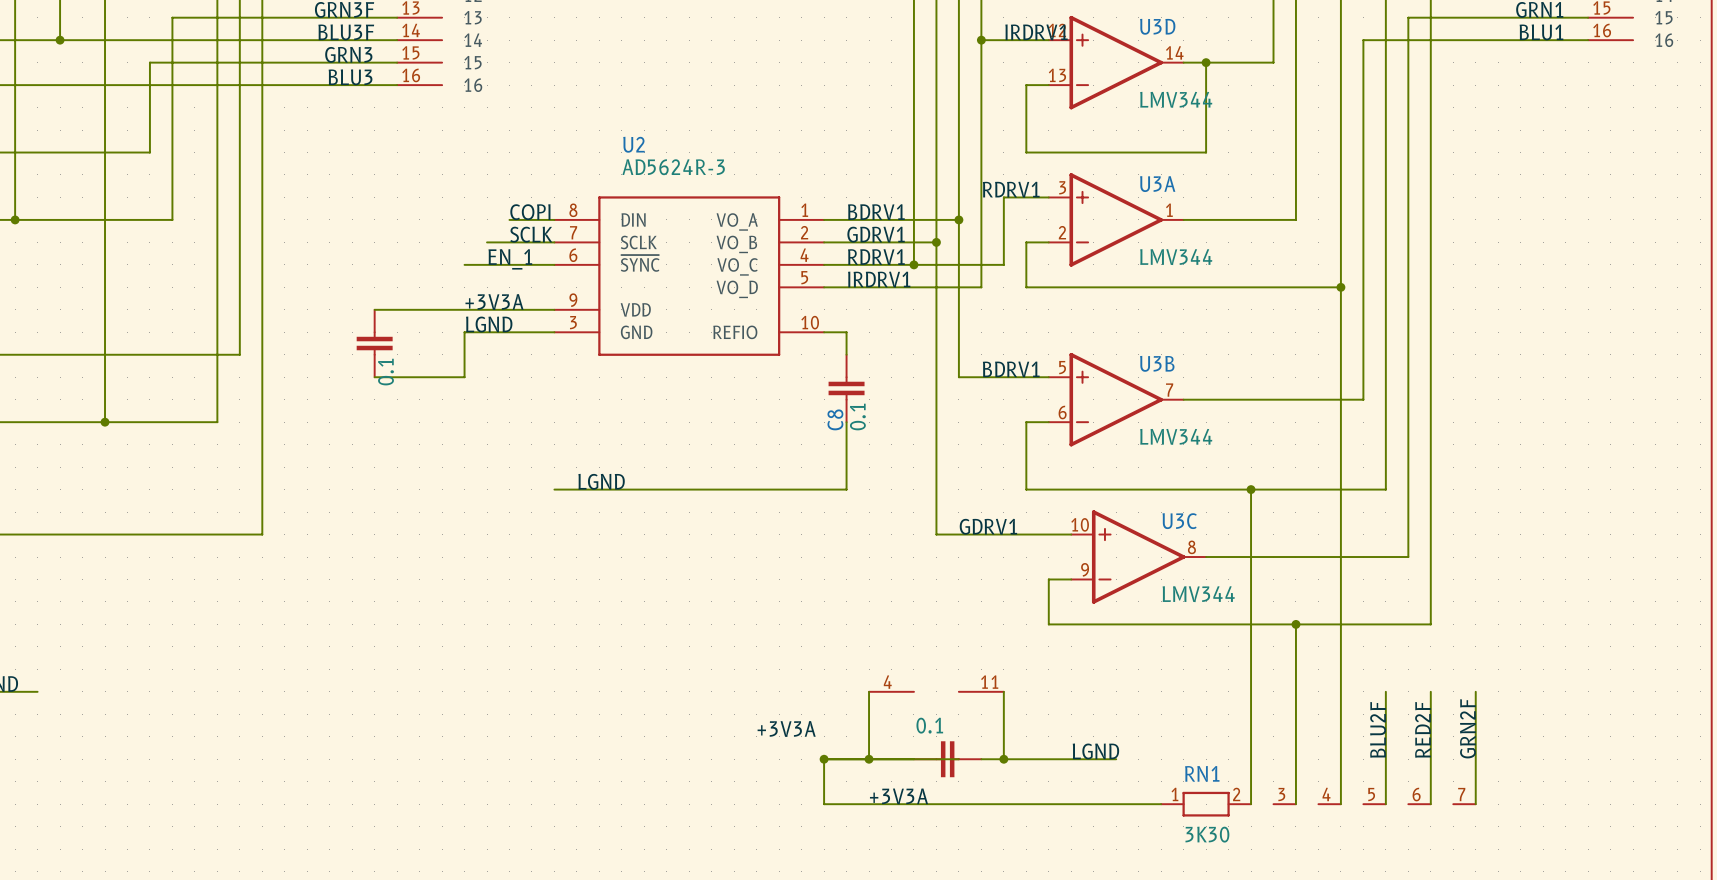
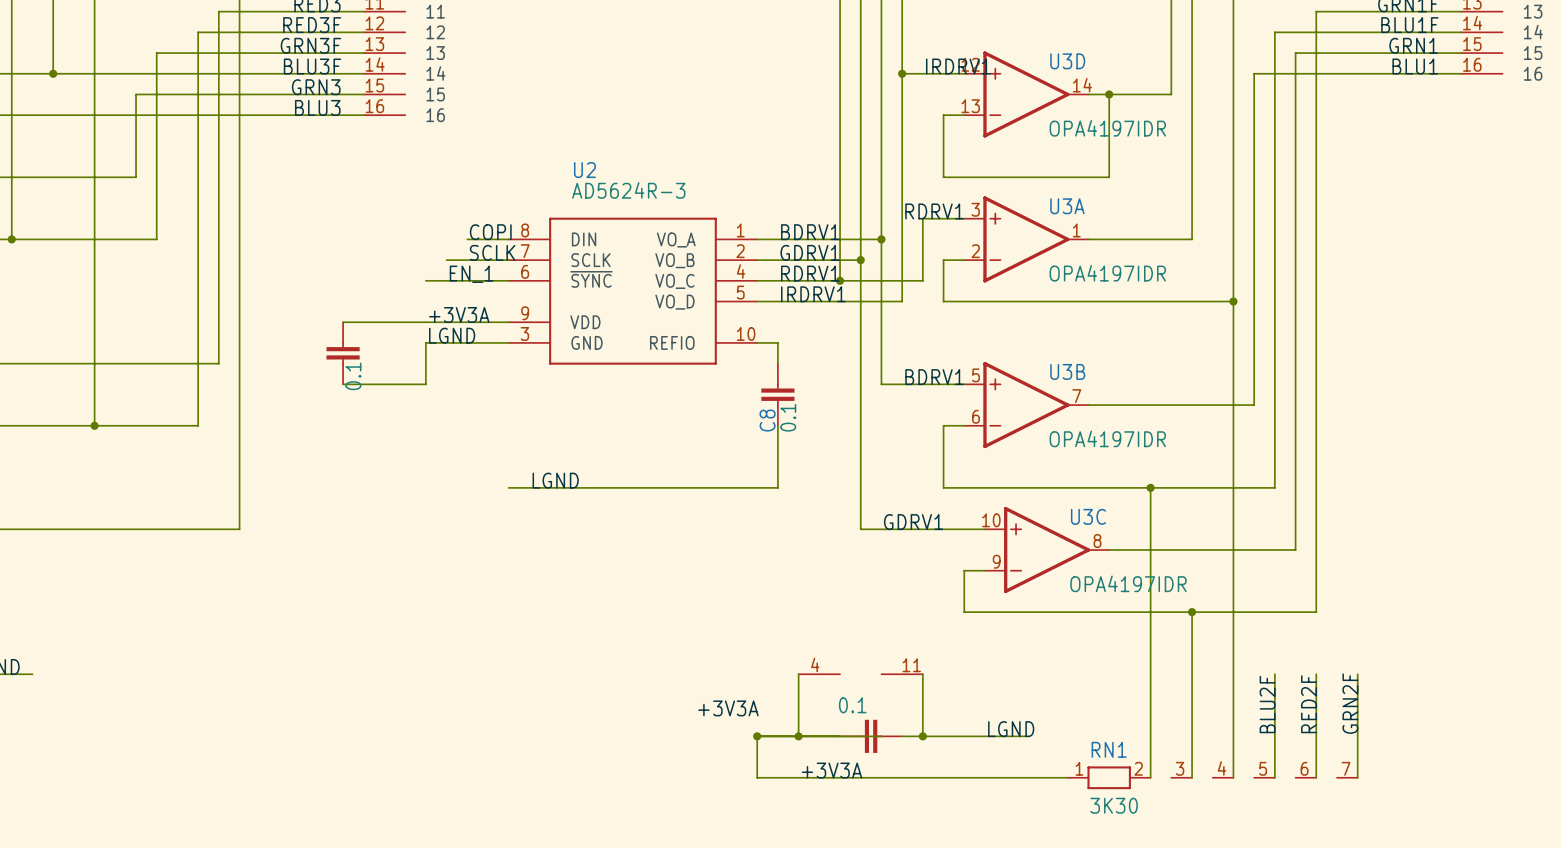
U3D value: LMV344 (1176, 99) -> OPA4197IDR (1107, 128)
U3A value: LMV344 (1176, 257) -> OPA4197IDR (1107, 273)
U3B value: LMV344 (1176, 436) -> OPA4197IDR (1107, 438)
U3C value: LMV344 (1198, 594) -> OPA4197IDR (1128, 583)

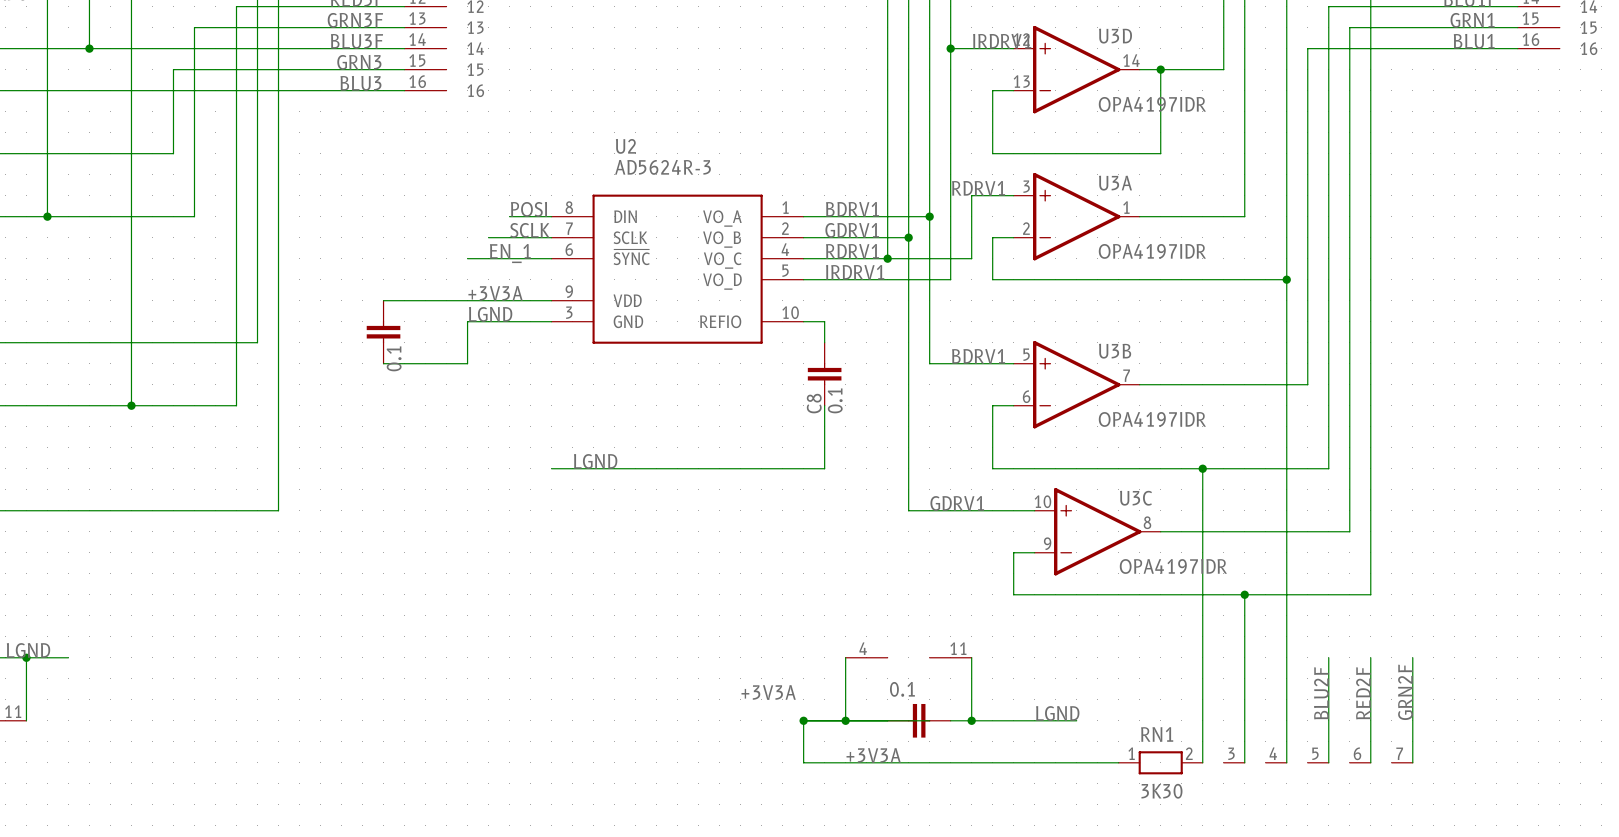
label: COPI (490, 232) -> POSI (528, 209)

